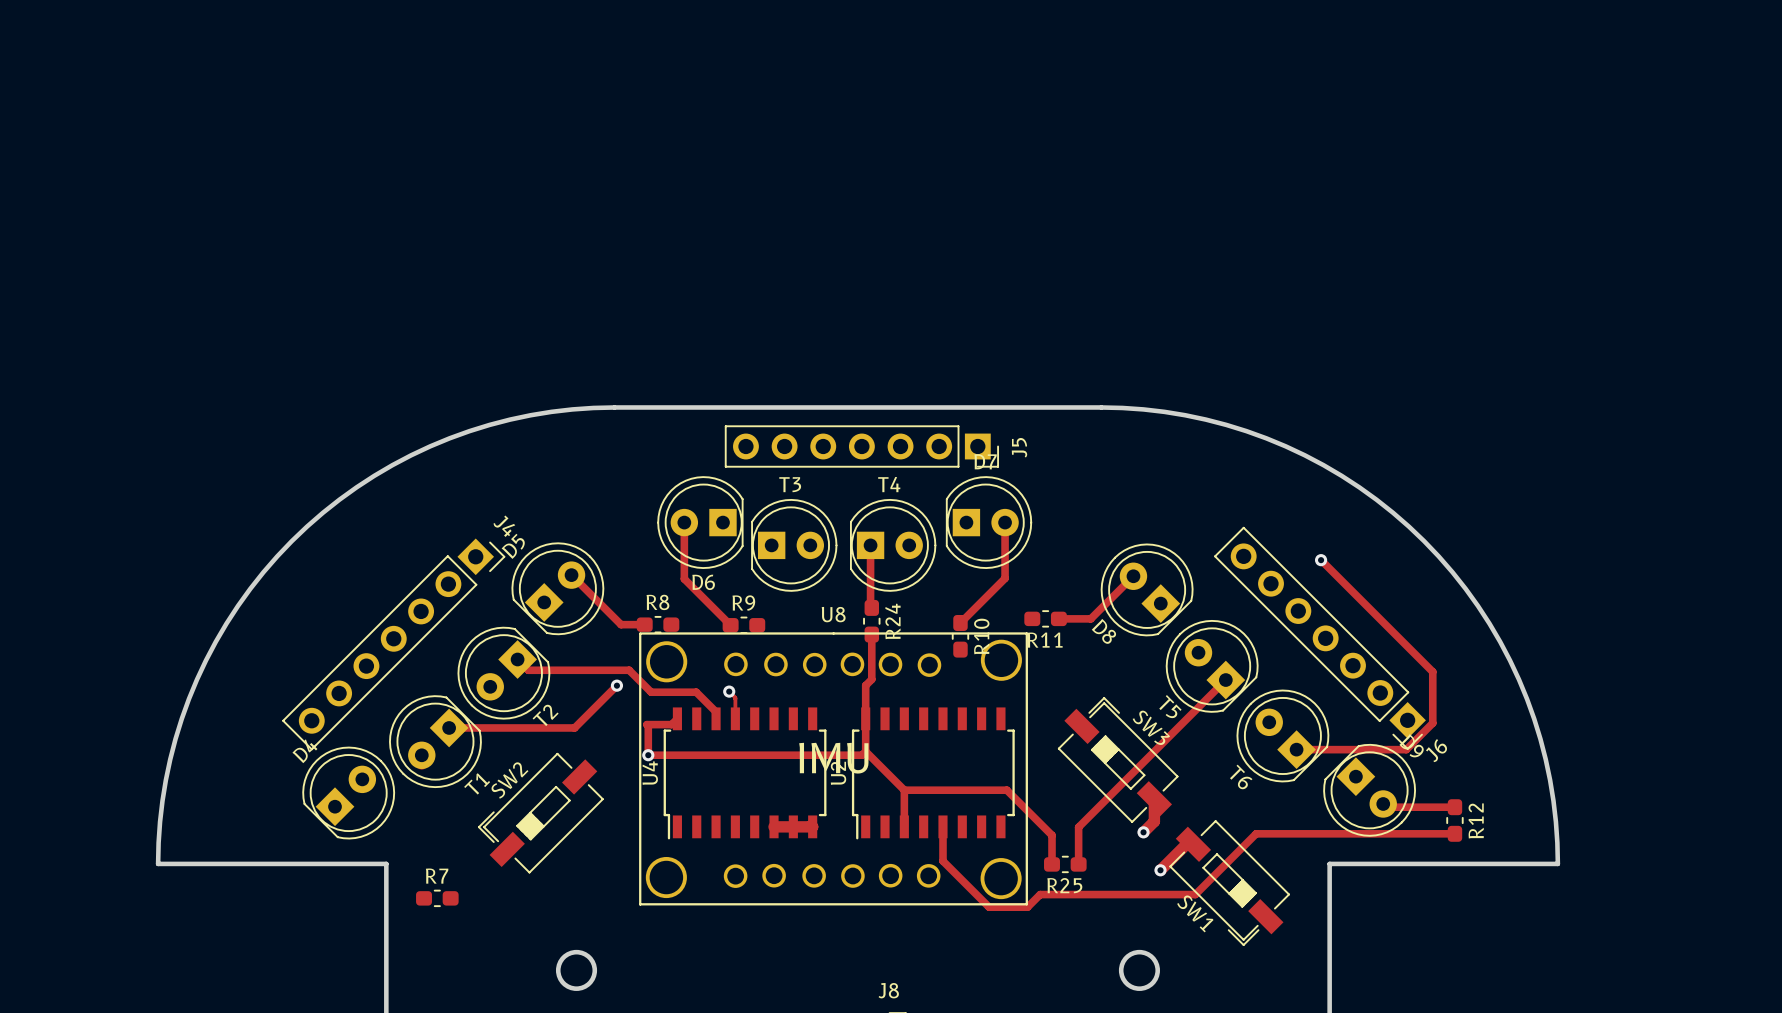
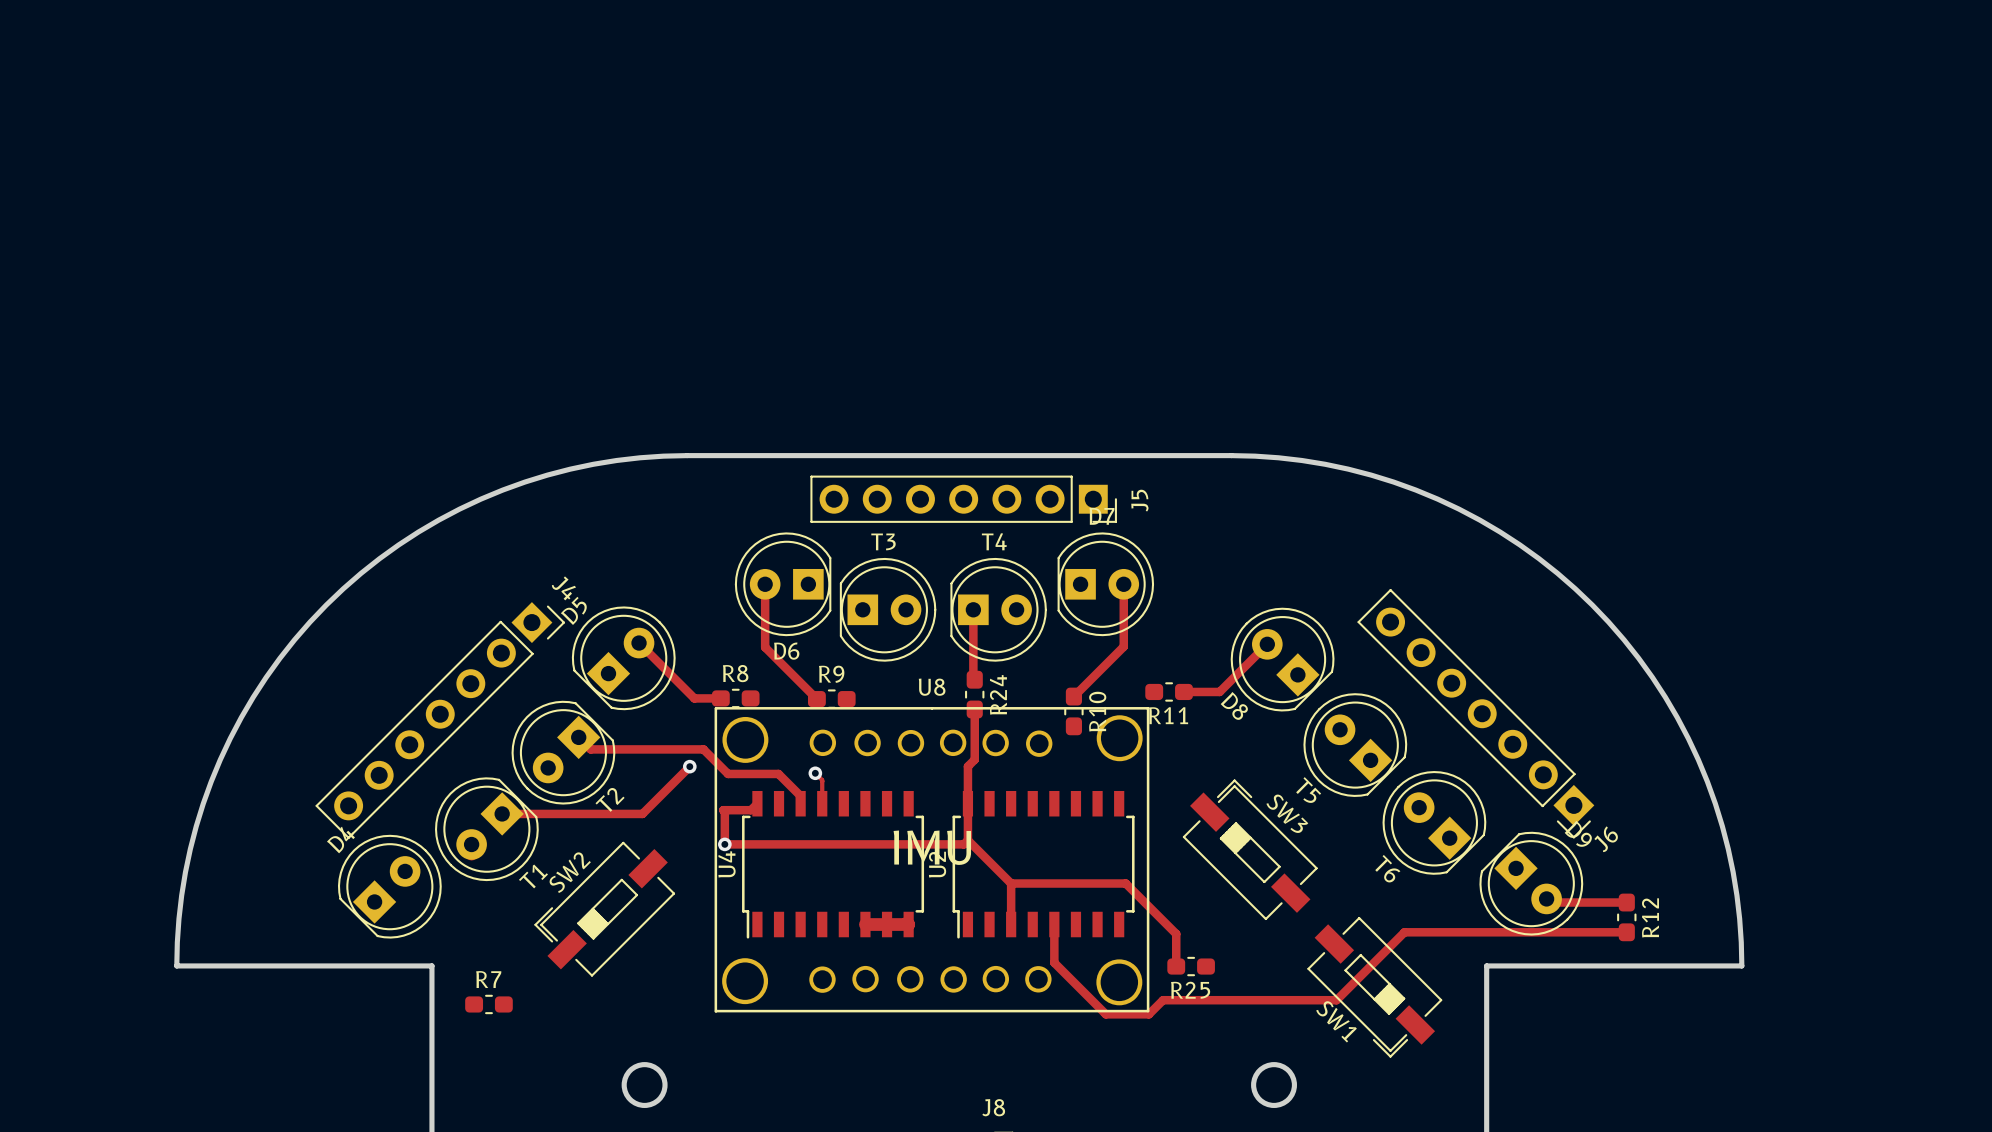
track: (1321, 560) (1432, 671) (1432, 723) (1406, 749) (1296, 749) -> none
via: (1321, 560) -> none
track: (1225, 680) (1078, 827) (1078, 864) -> none
track: (1154, 798) (1154, 821) (1143, 832) -> none
via: (1143, 832) -> none
track: (1193, 844) (1186, 844) (1160, 870) -> none
via: (1160, 870) -> none

